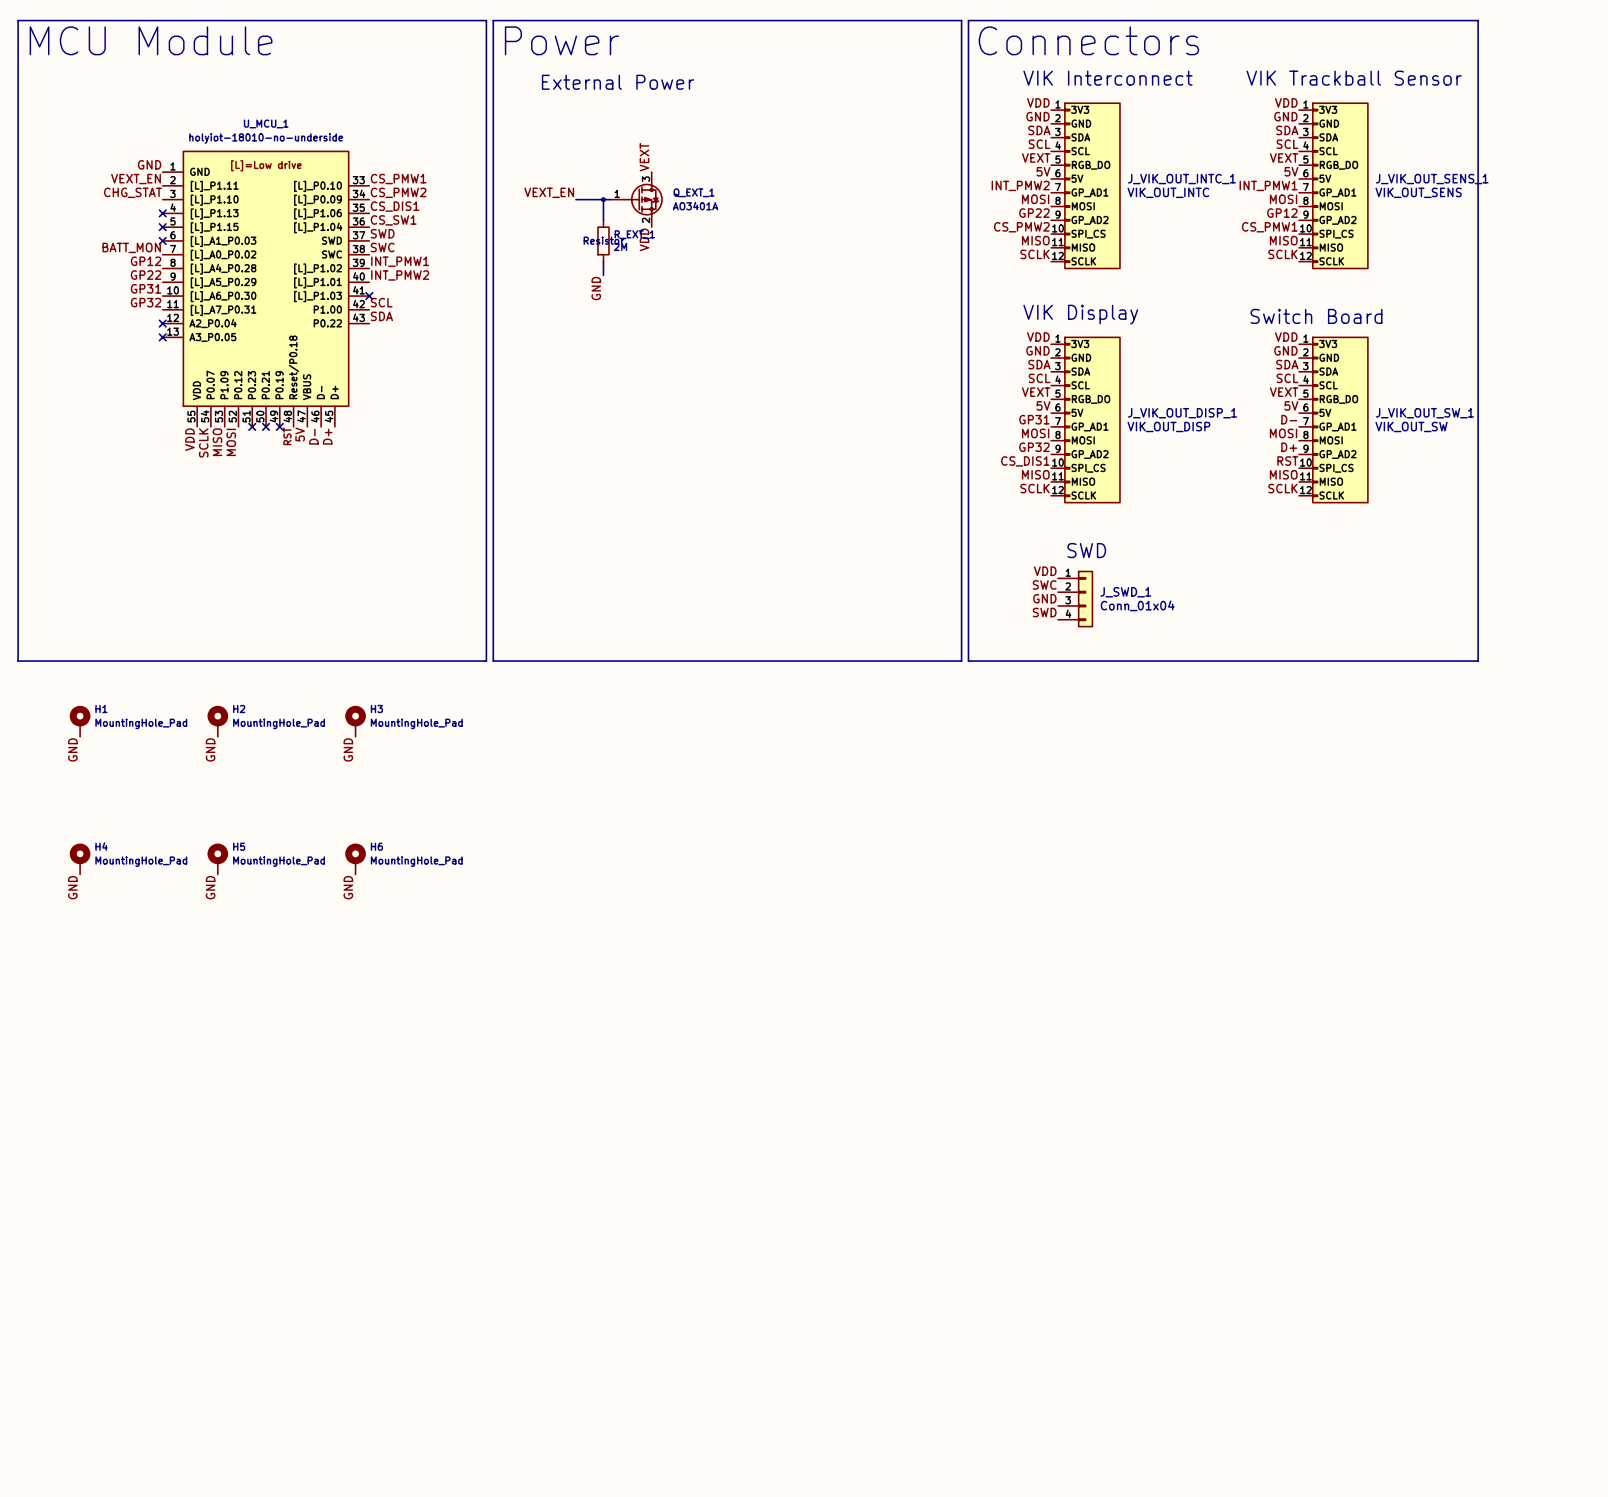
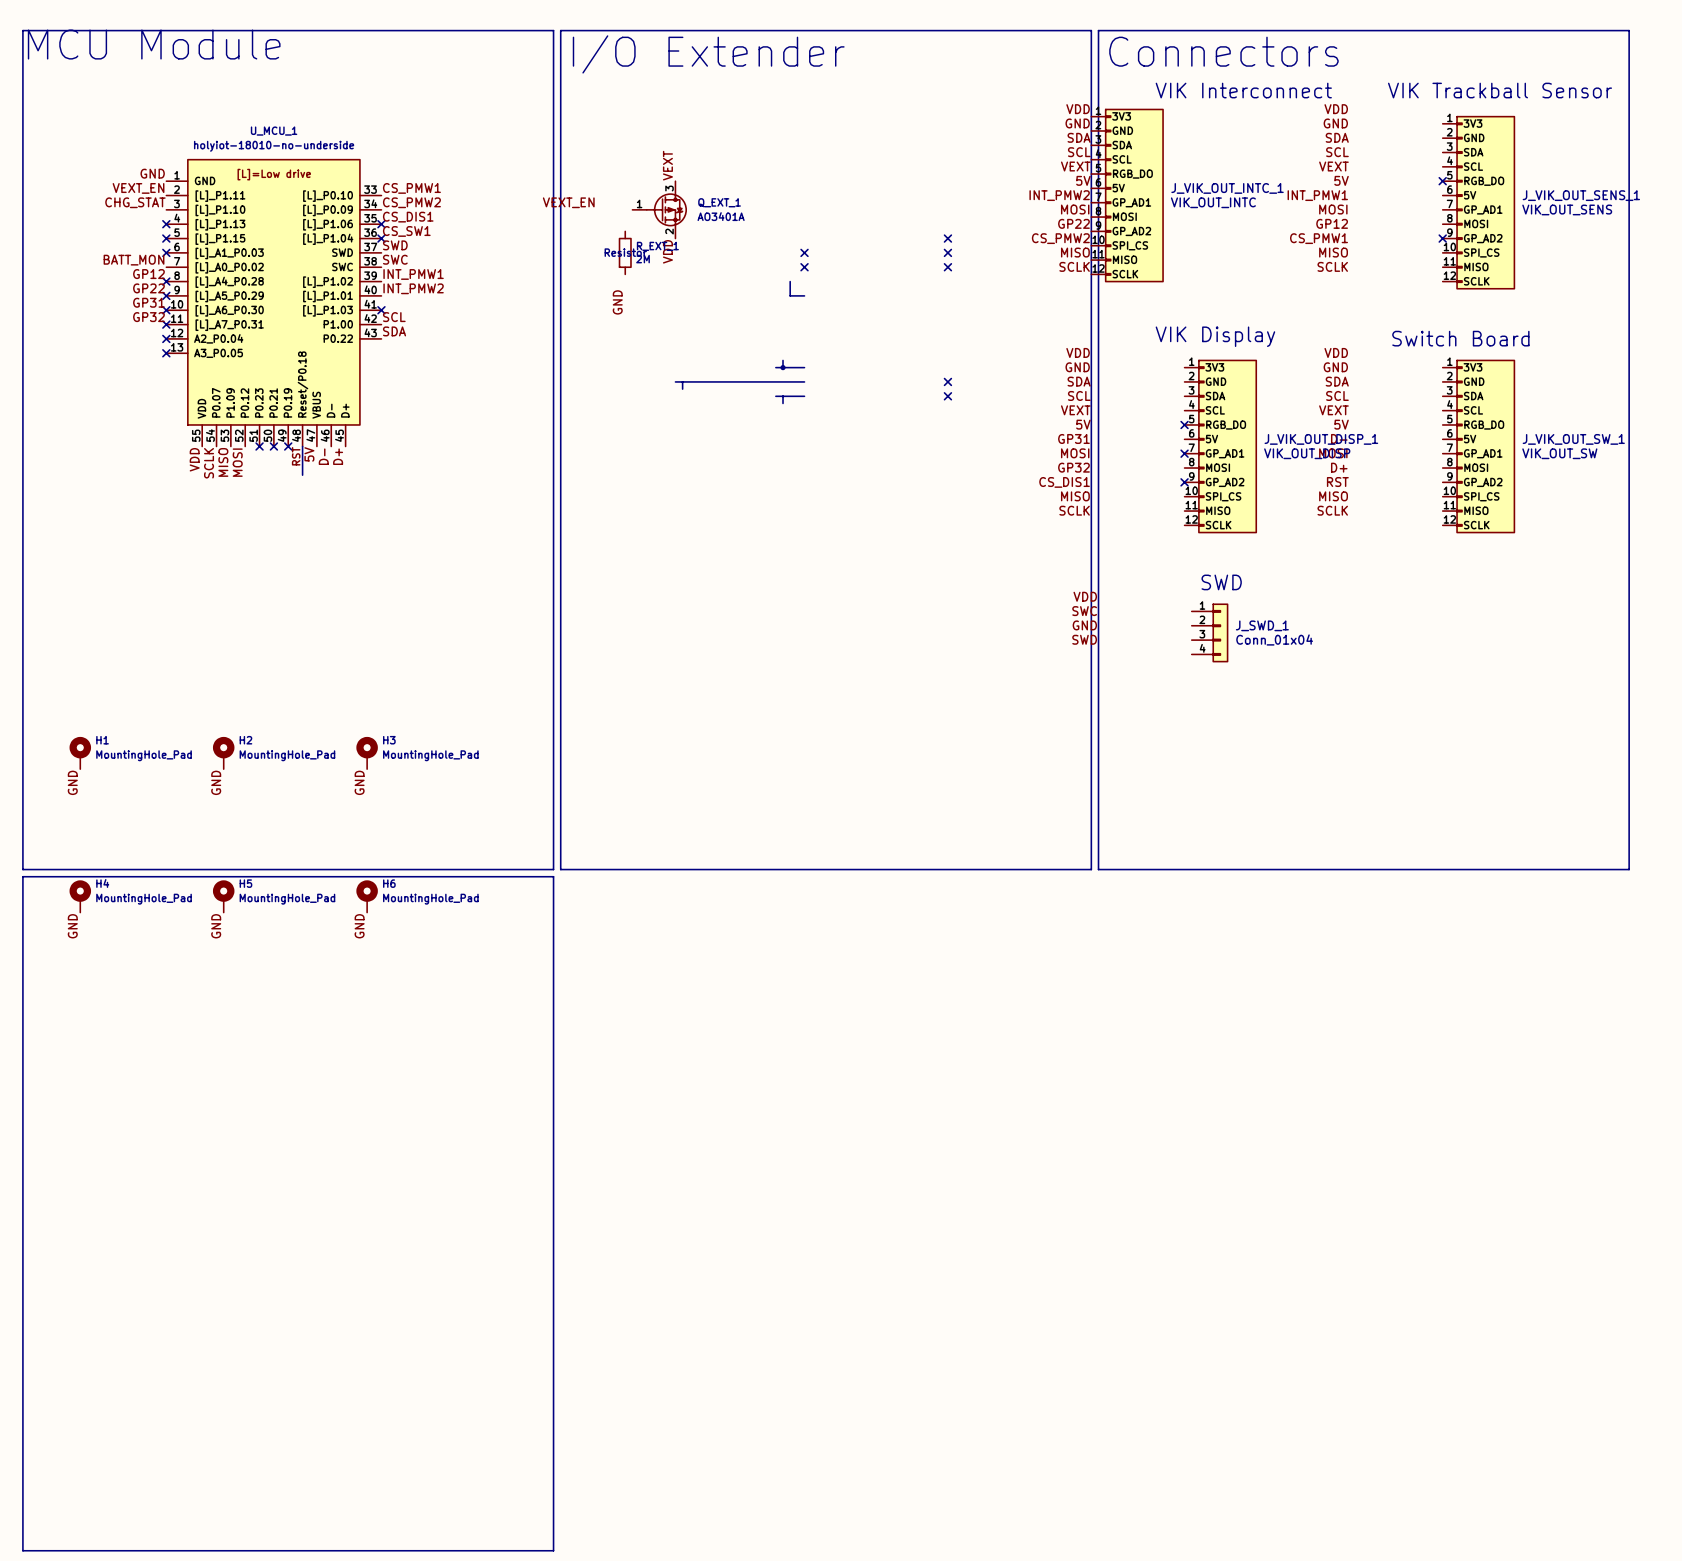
line: (18, 20) (486, 20) (486, 661) (18, 661) (18, 20) -> (22, 30) (22, 869) (553, 869) (553, 30) (22, 30)
line: (493, 20) (961, 20) (961, 661) (493, 661) (493, 20) -> (560, 30) (560, 869) (1091, 869) (1091, 30) (560, 30)
line: (968, 20) (1478, 20) (1478, 661) (968, 661) (968, 20) -> (1098, 30) (1098, 869) (1629, 869) (1629, 30) (1098, 30)
text: Power (561, 40) -> none
text position: Connectors (1088, 40) -> Connectors (1223, 51)
text: none -> I/O Extender (708, 54)
text position: VIK Interconnect (1108, 78) -> VIK Interconnect (1243, 90)
text position: VIK Trackball Sensor (1354, 78) -> VIK Trackball Sensor (1500, 90)
text: External Power (617, 82) -> none
no-connect mark: none -> (1442, 181)
J_VIK_OUT_SENS_1 position: (1333, 185) -> (1478, 202)
wire: (575, 199) (610, 199) -> none
wire: (603, 199) (603, 220) -> none
junction: (603, 199) -> none
no-connect mark: none -> (381, 224)
no-connect mark: none -> (381, 238)
no-connect mark: none -> (947, 238)
no-connect mark: none -> (1442, 238)
no-connect mark: none -> (804, 252)
no-connect mark: none -> (947, 252)
no-connect mark: none -> (804, 267)
no-connect mark: none -> (947, 267)
wire: (603, 261) (603, 275) -> none
no-connect mark: none -> (166, 281)
wire: none -> (790, 281) (790, 295) (804, 295)
no-connect mark: none -> (166, 295)
no-connect mark: none -> (166, 310)
no-connect mark: none -> (166, 324)
text position: VIK Display (1080, 314) -> VIK Display (1215, 336)
text position: Switch Board (1316, 316) -> Switch Board (1460, 338)
wire: none -> (783, 360) (783, 367)
wire: none -> (775, 367) (804, 367)
junction: none -> (783, 367)
wire: none -> (675, 381) (804, 381)
wire: none -> (682, 381) (682, 389)
no-connect mark: none -> (947, 381)
wire: none -> (775, 396) (804, 396)
wire: none -> (783, 396) (783, 403)
no-connect mark: none -> (947, 396)
no-connect mark: none -> (1184, 424)
J_VIK_OUT_DISP_1 position: (1085, 420) -> (1220, 446)
J_VIK_OUT_SW_1 position: (1333, 420) -> (1478, 446)
wire: none -> (302, 446) (302, 475)
no-connect mark: none -> (1184, 453)
no-connect mark: none -> (1184, 482)
text position: SWD (1086, 550) -> SWD (1221, 582)
J_SWD_1 position: (1075, 599) -> (1210, 632)
line: none -> (22, 876) (22, 1550) (553, 1550) (553, 876) (22, 876)

